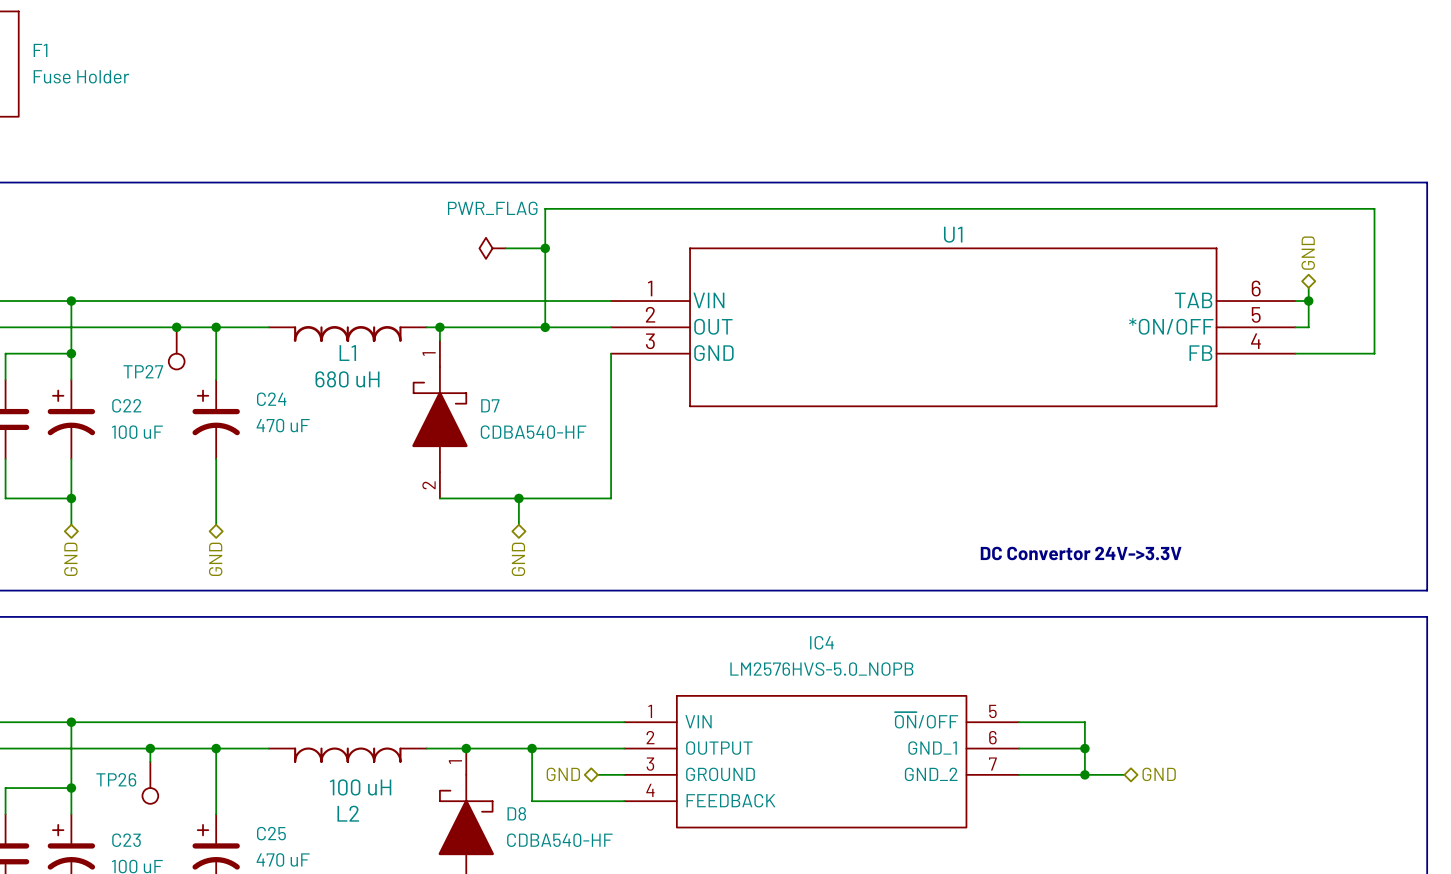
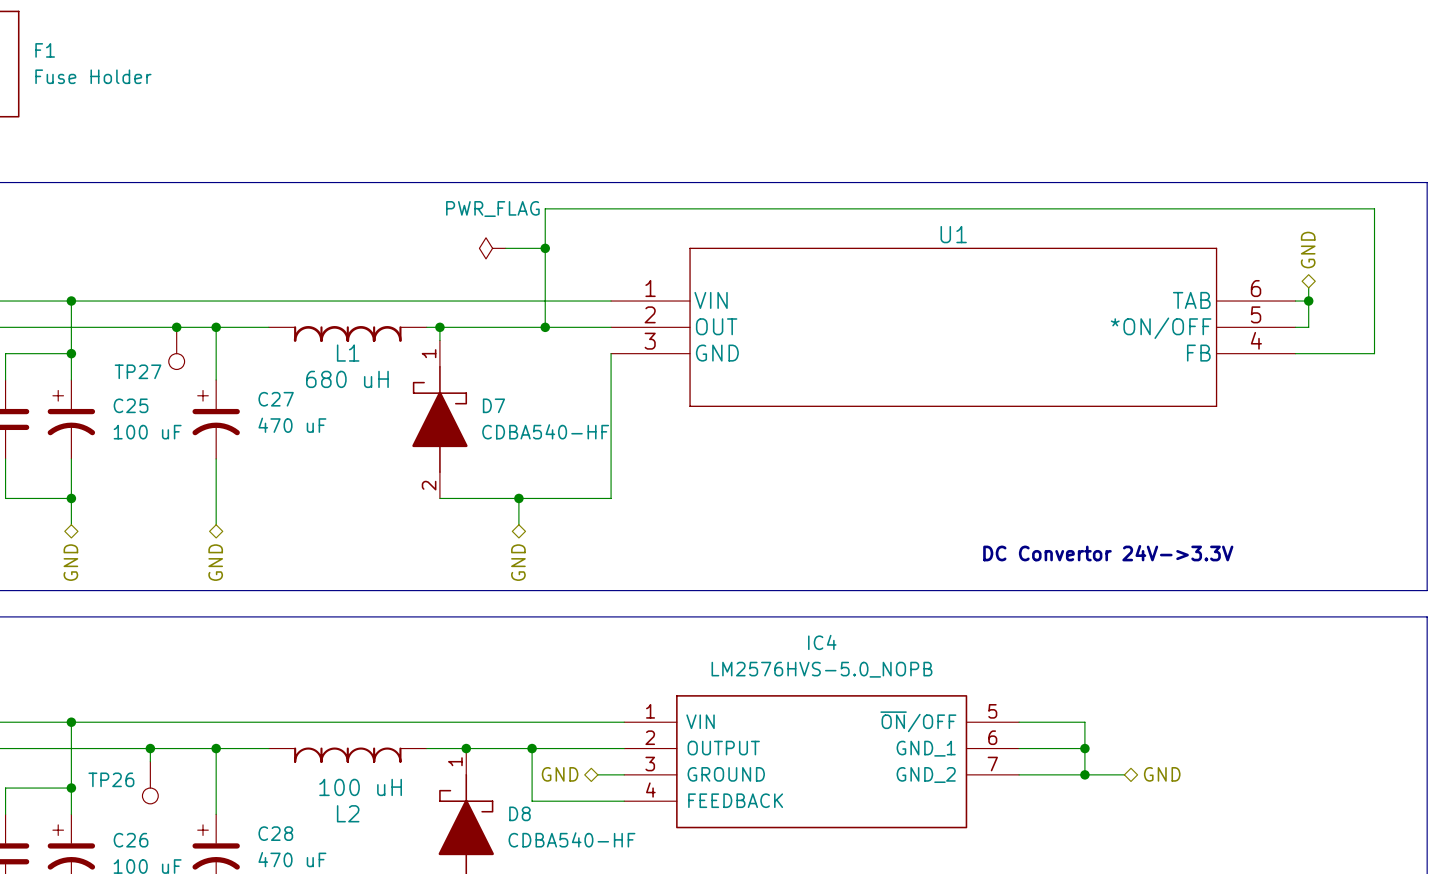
C24 name: C24 (271, 399) -> C27 (276, 399)
C22 name: C22 (126, 405) -> C25 (131, 405)
C25 name: C25 (271, 833) -> C28 (275, 833)
C23 name: C23 (126, 840) -> C26 (131, 840)

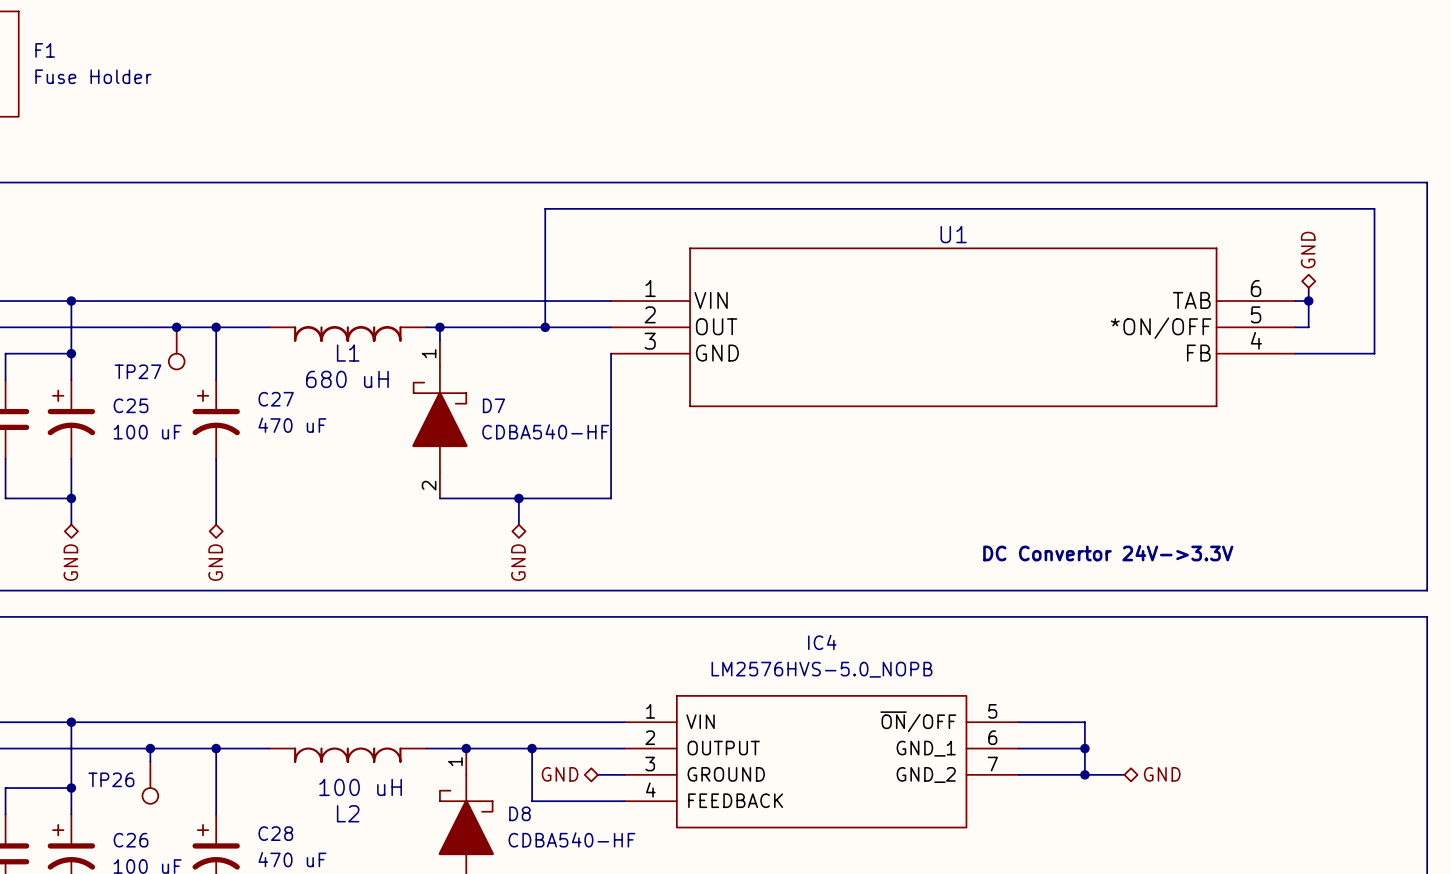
power symbol: PWR_FLAG (492, 248) -> none
wire: (505, 248) (545, 248) -> none
junction: (545, 248) -> none

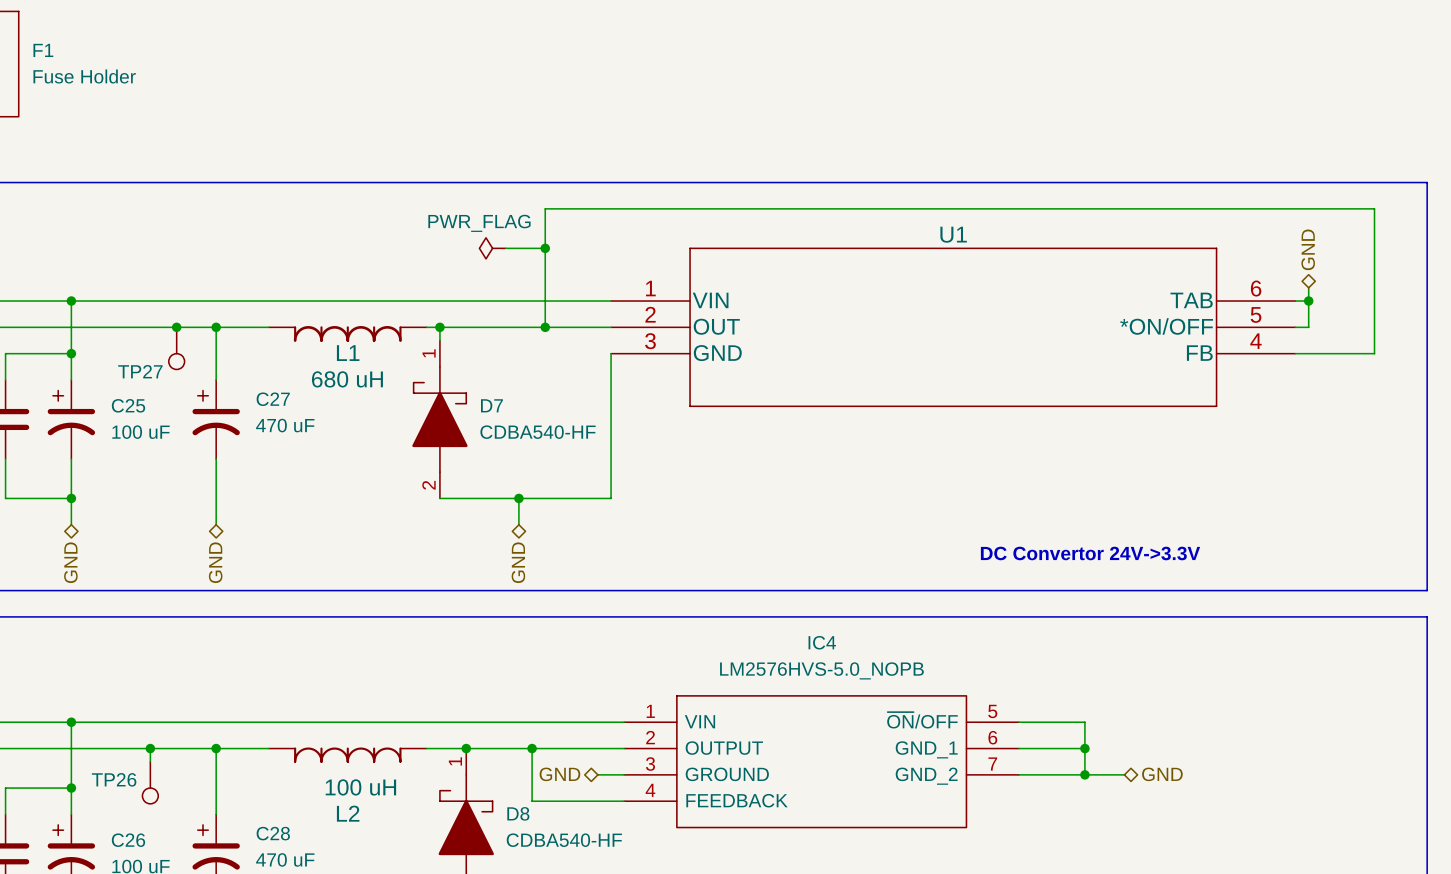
power symbol: none -> PWR_FLAG (492, 248)
wire: none -> (505, 248) (545, 248)
junction: none -> (545, 248)

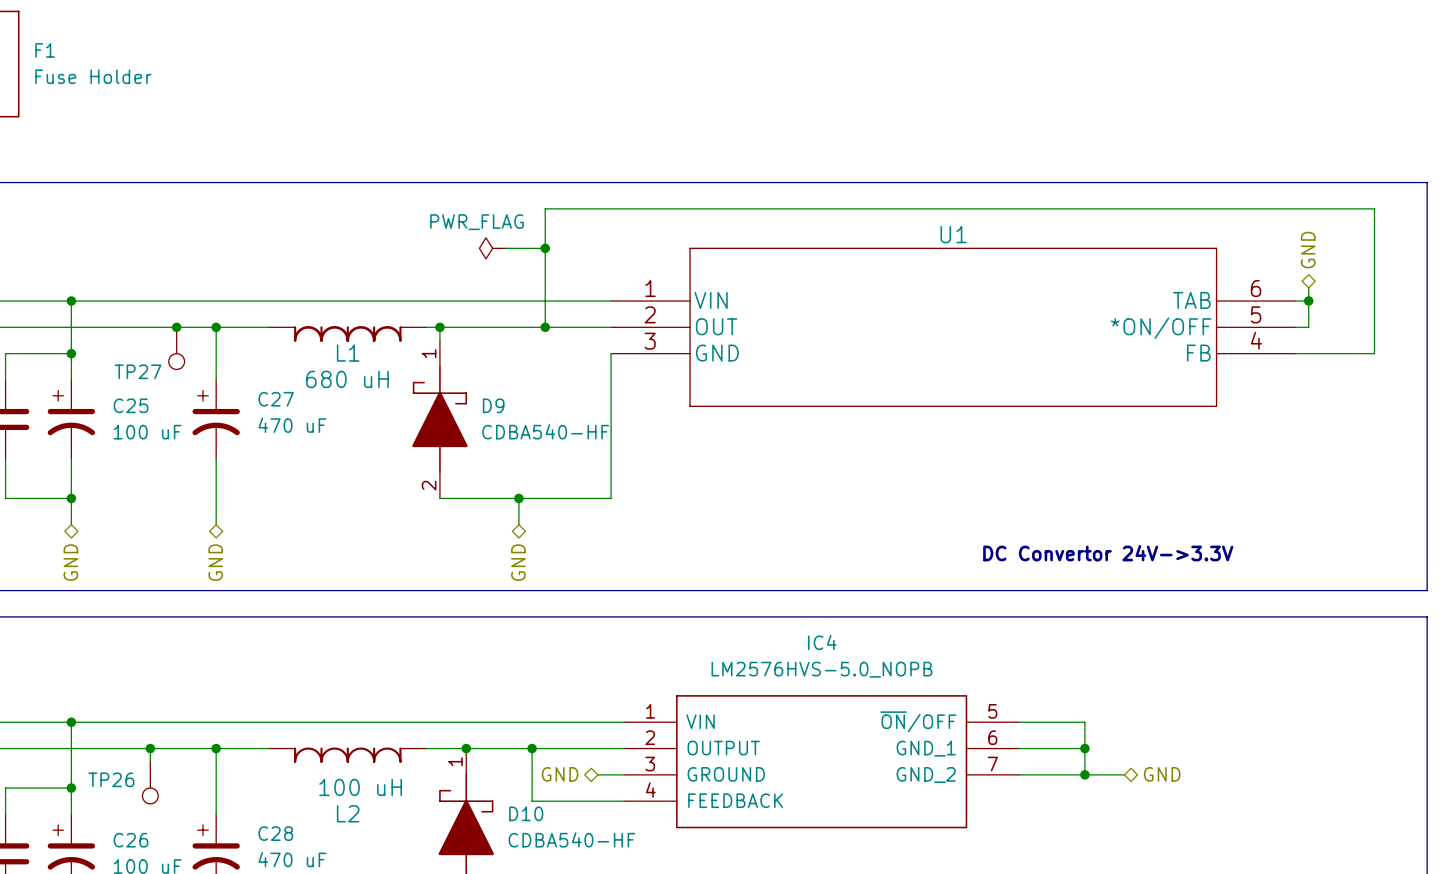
D7 name: D7 (491, 405) -> D9 (493, 405)
D8 name: D8 (518, 813) -> D10 (526, 813)

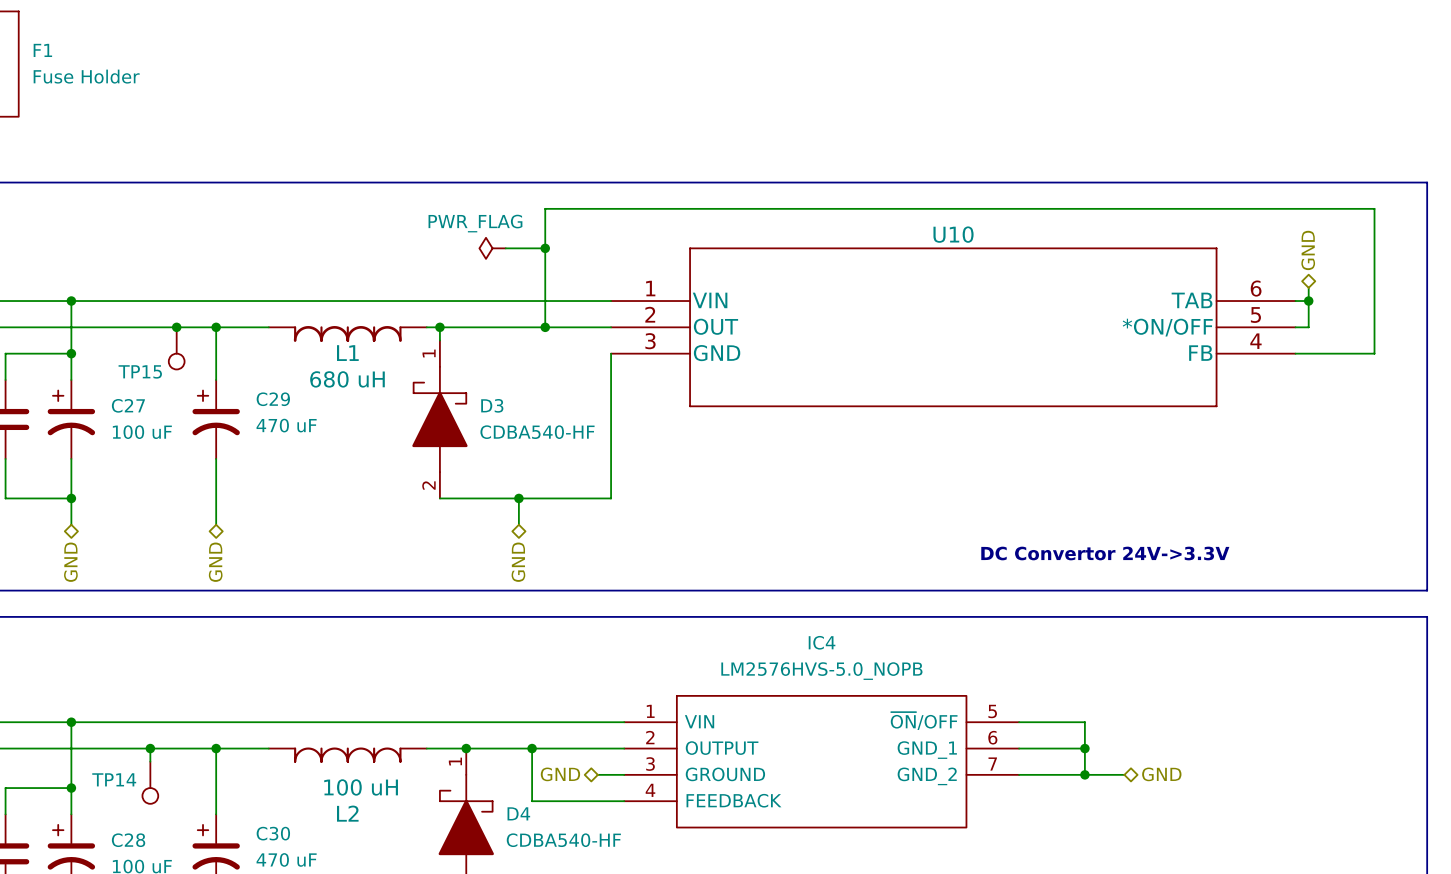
U1 name: U1 (953, 234) -> U10 (953, 234)
TP27 name: TP27 (138, 371) -> TP15 (140, 371)
C27 name: C27 (276, 399) -> C29 (273, 399)
C25 name: C25 (131, 405) -> C27 (128, 405)
D9 name: D9 (493, 405) -> D3 (492, 405)
TP26 name: TP26 (111, 779) -> TP14 (114, 779)
D10 name: D10 (526, 813) -> D4 (518, 813)
C28 name: C28 (275, 833) -> C30 (273, 833)
C26 name: C26 (131, 840) -> C28 (128, 840)

